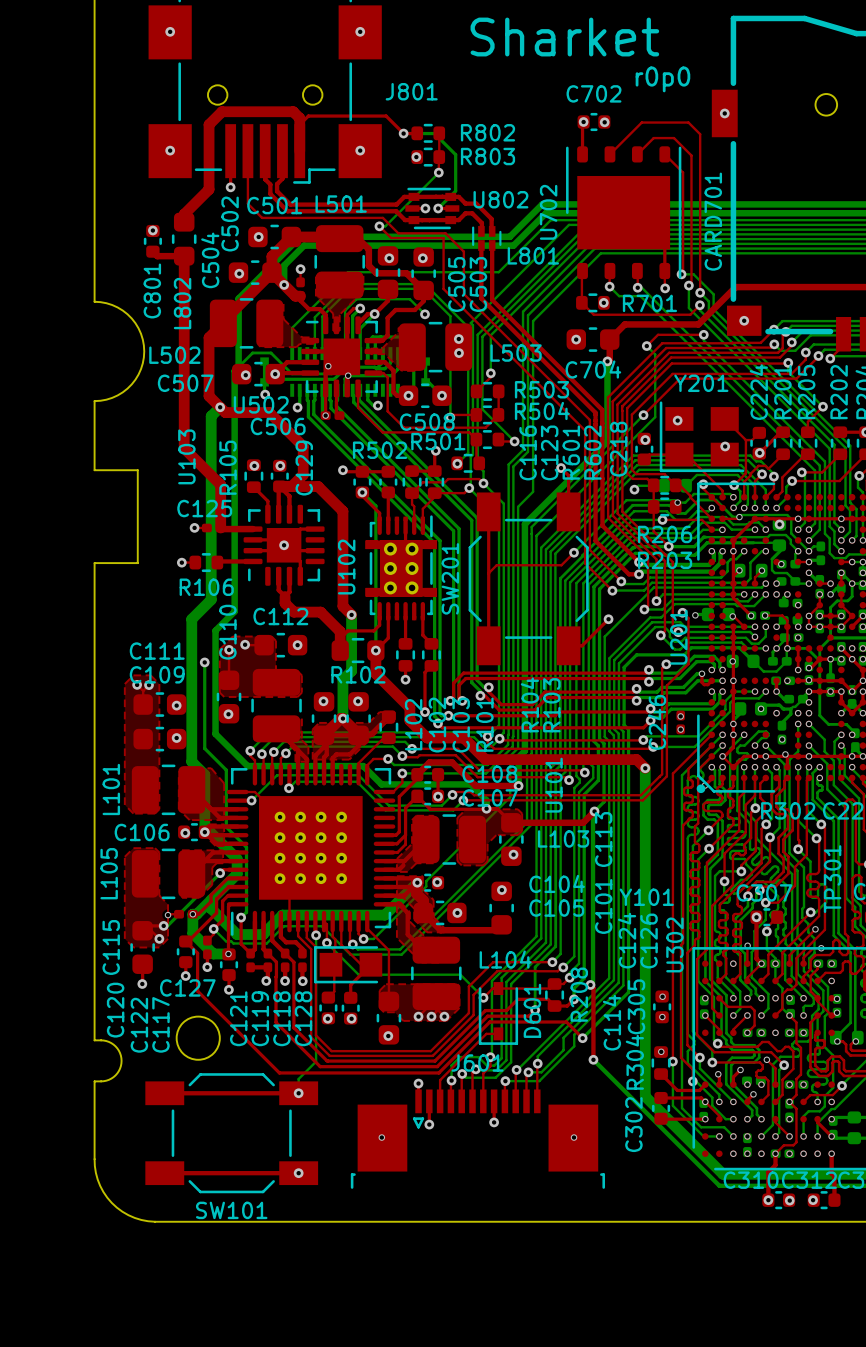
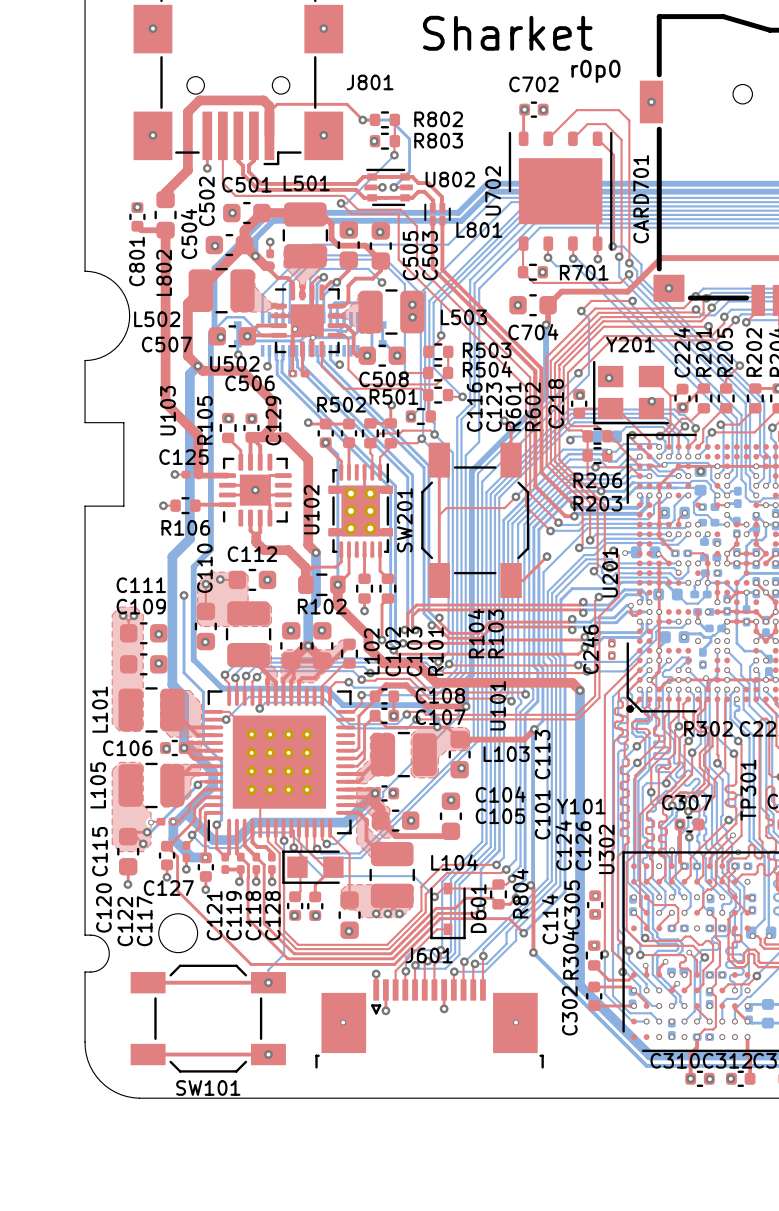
R208 name: R208 (579, 994) -> R804 (520, 893)

